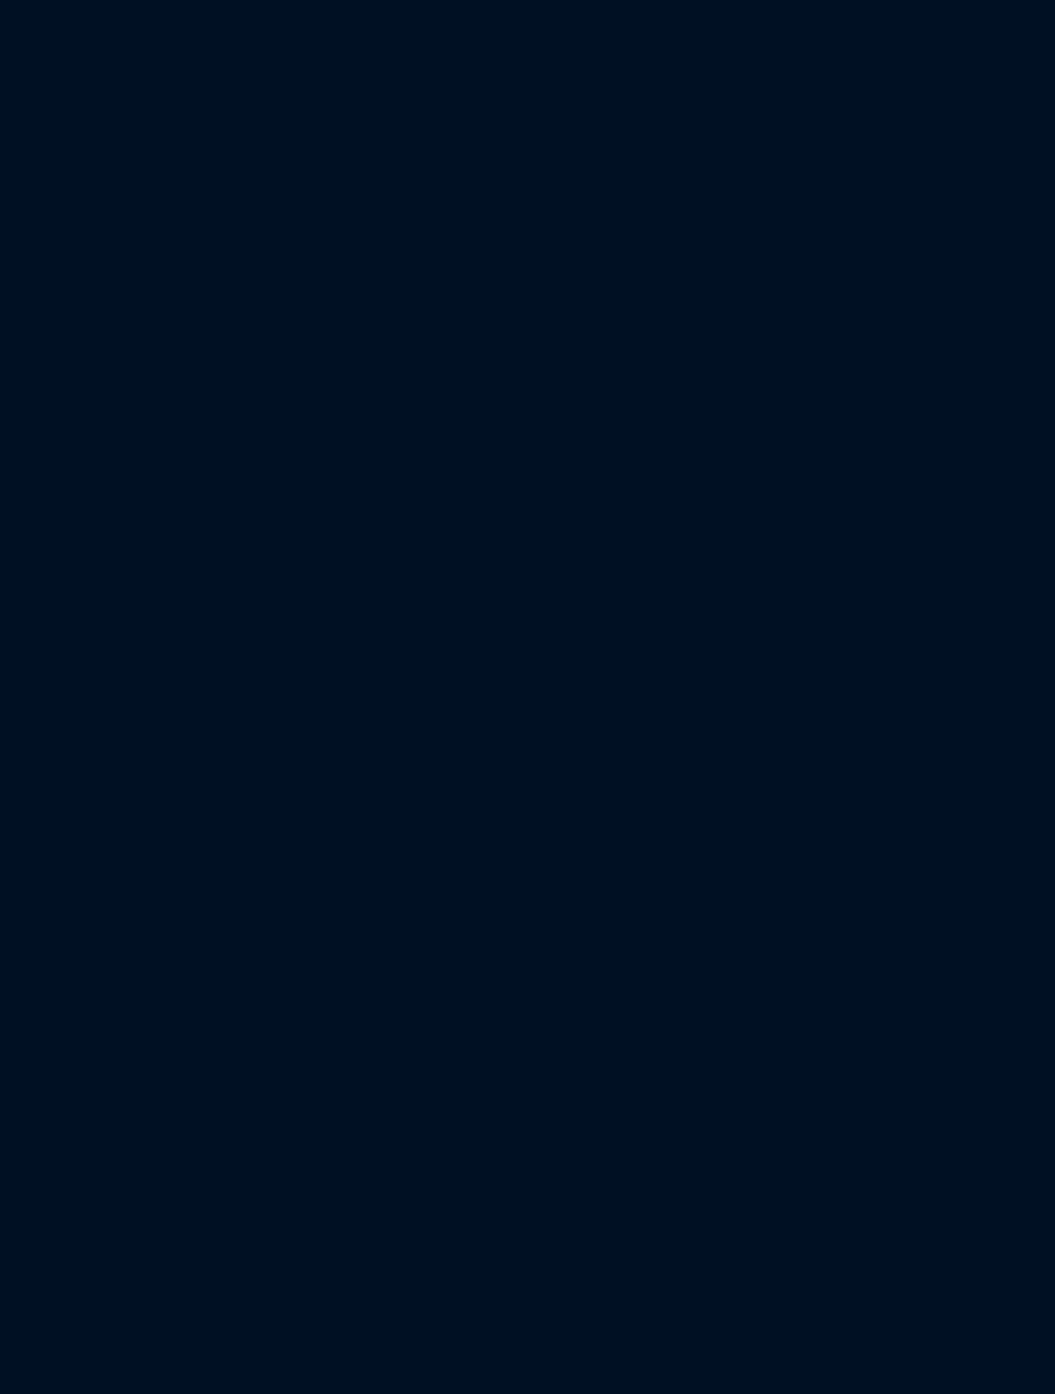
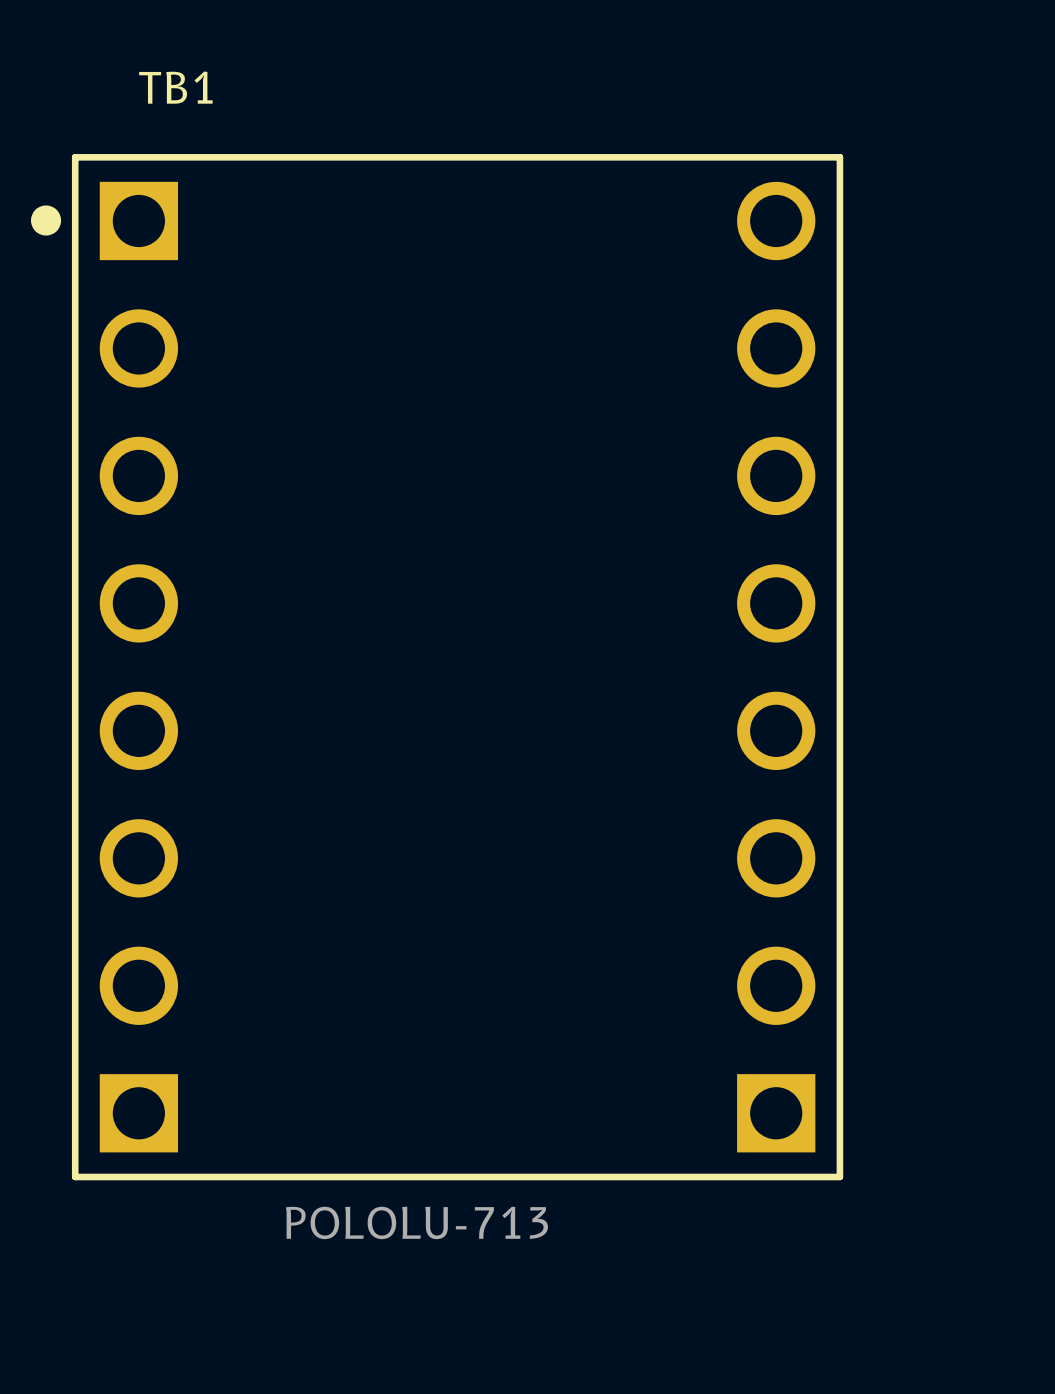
TB1: none -> POLOLU-713 (437, 667)

